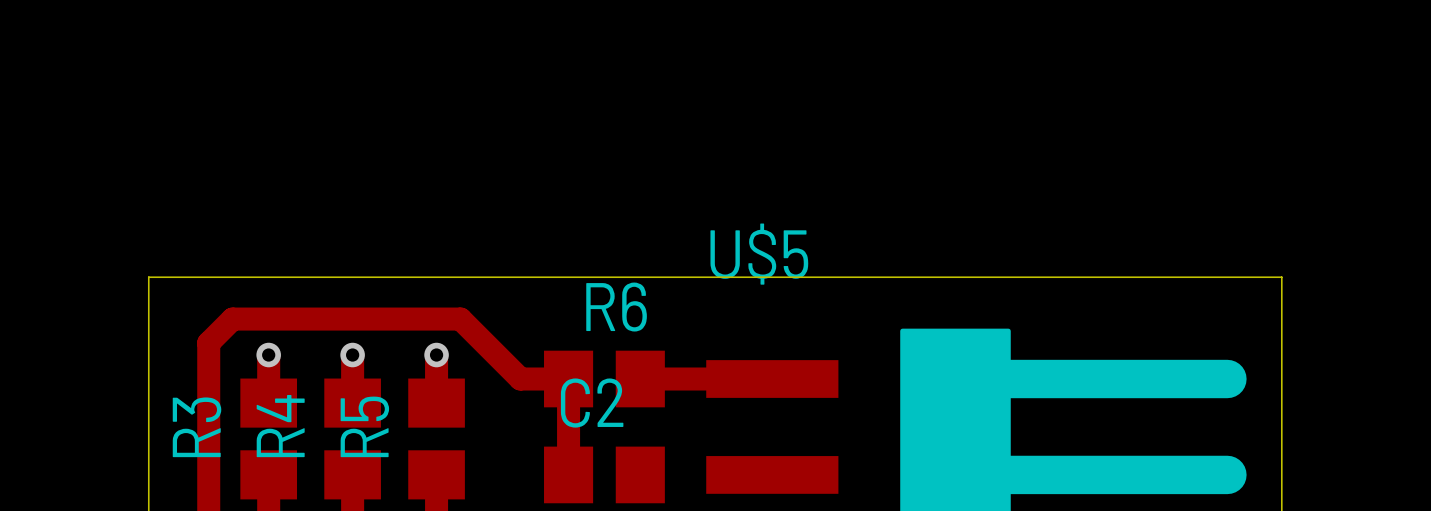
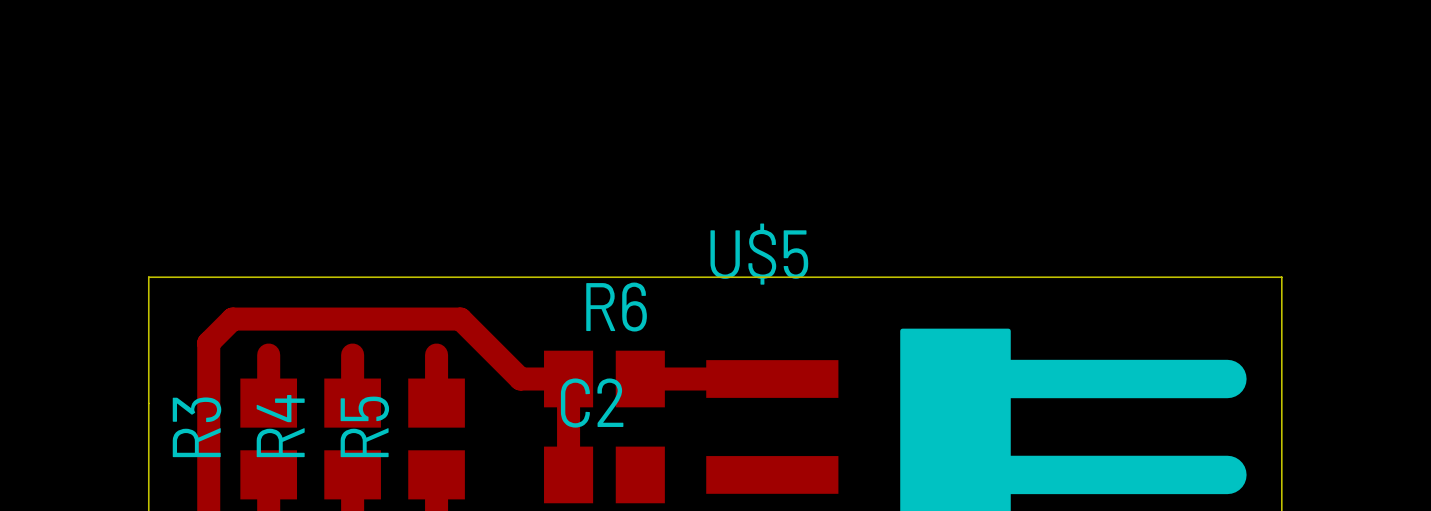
via: (268, 355) -> none
via: (352, 355) -> none
via: (436, 355) -> none

